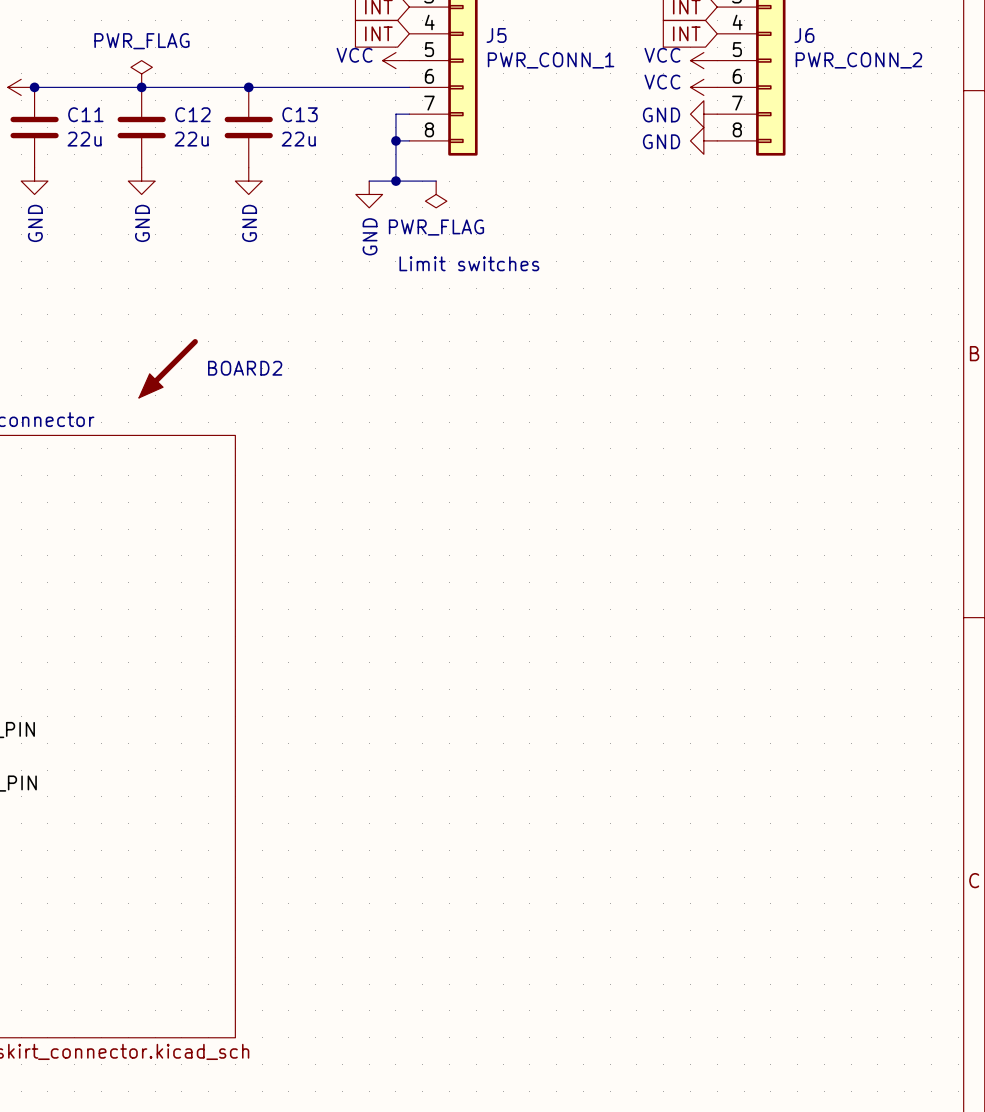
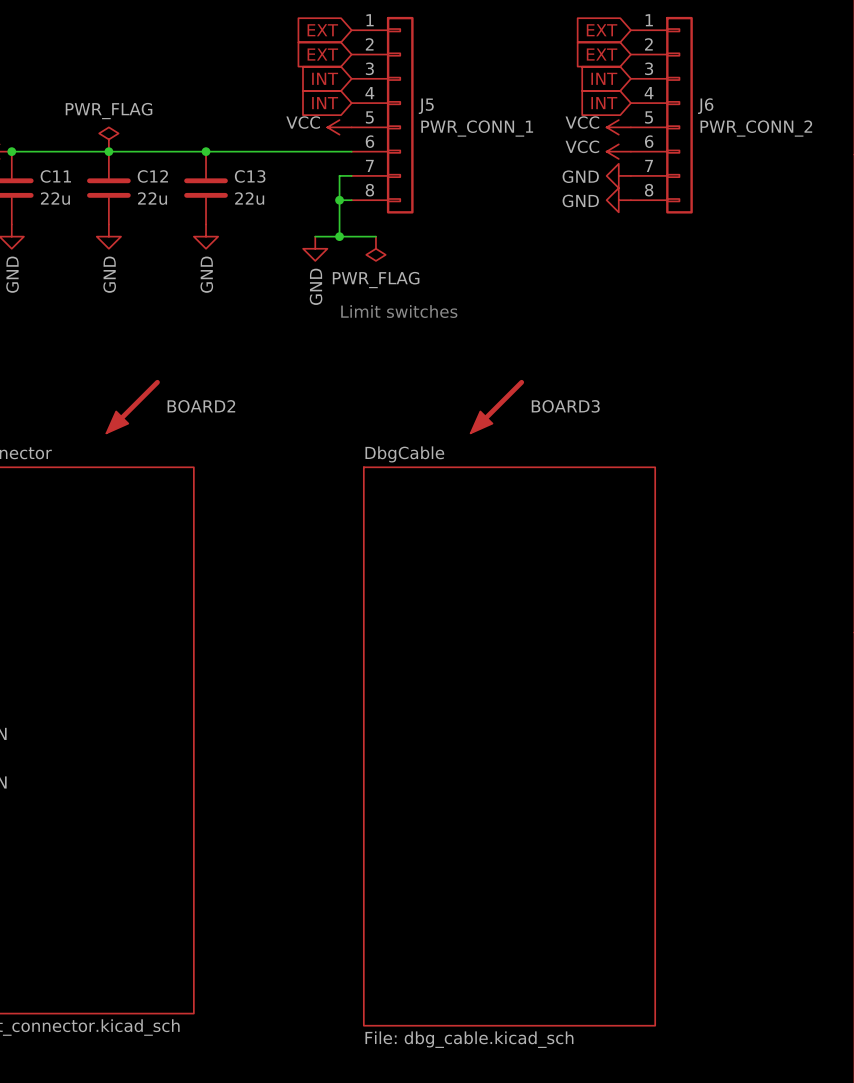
BOARD3: none -> (497, 406)
sheet DbgCable: none -> File: dbg_cable.kicad_sch (509, 746)

